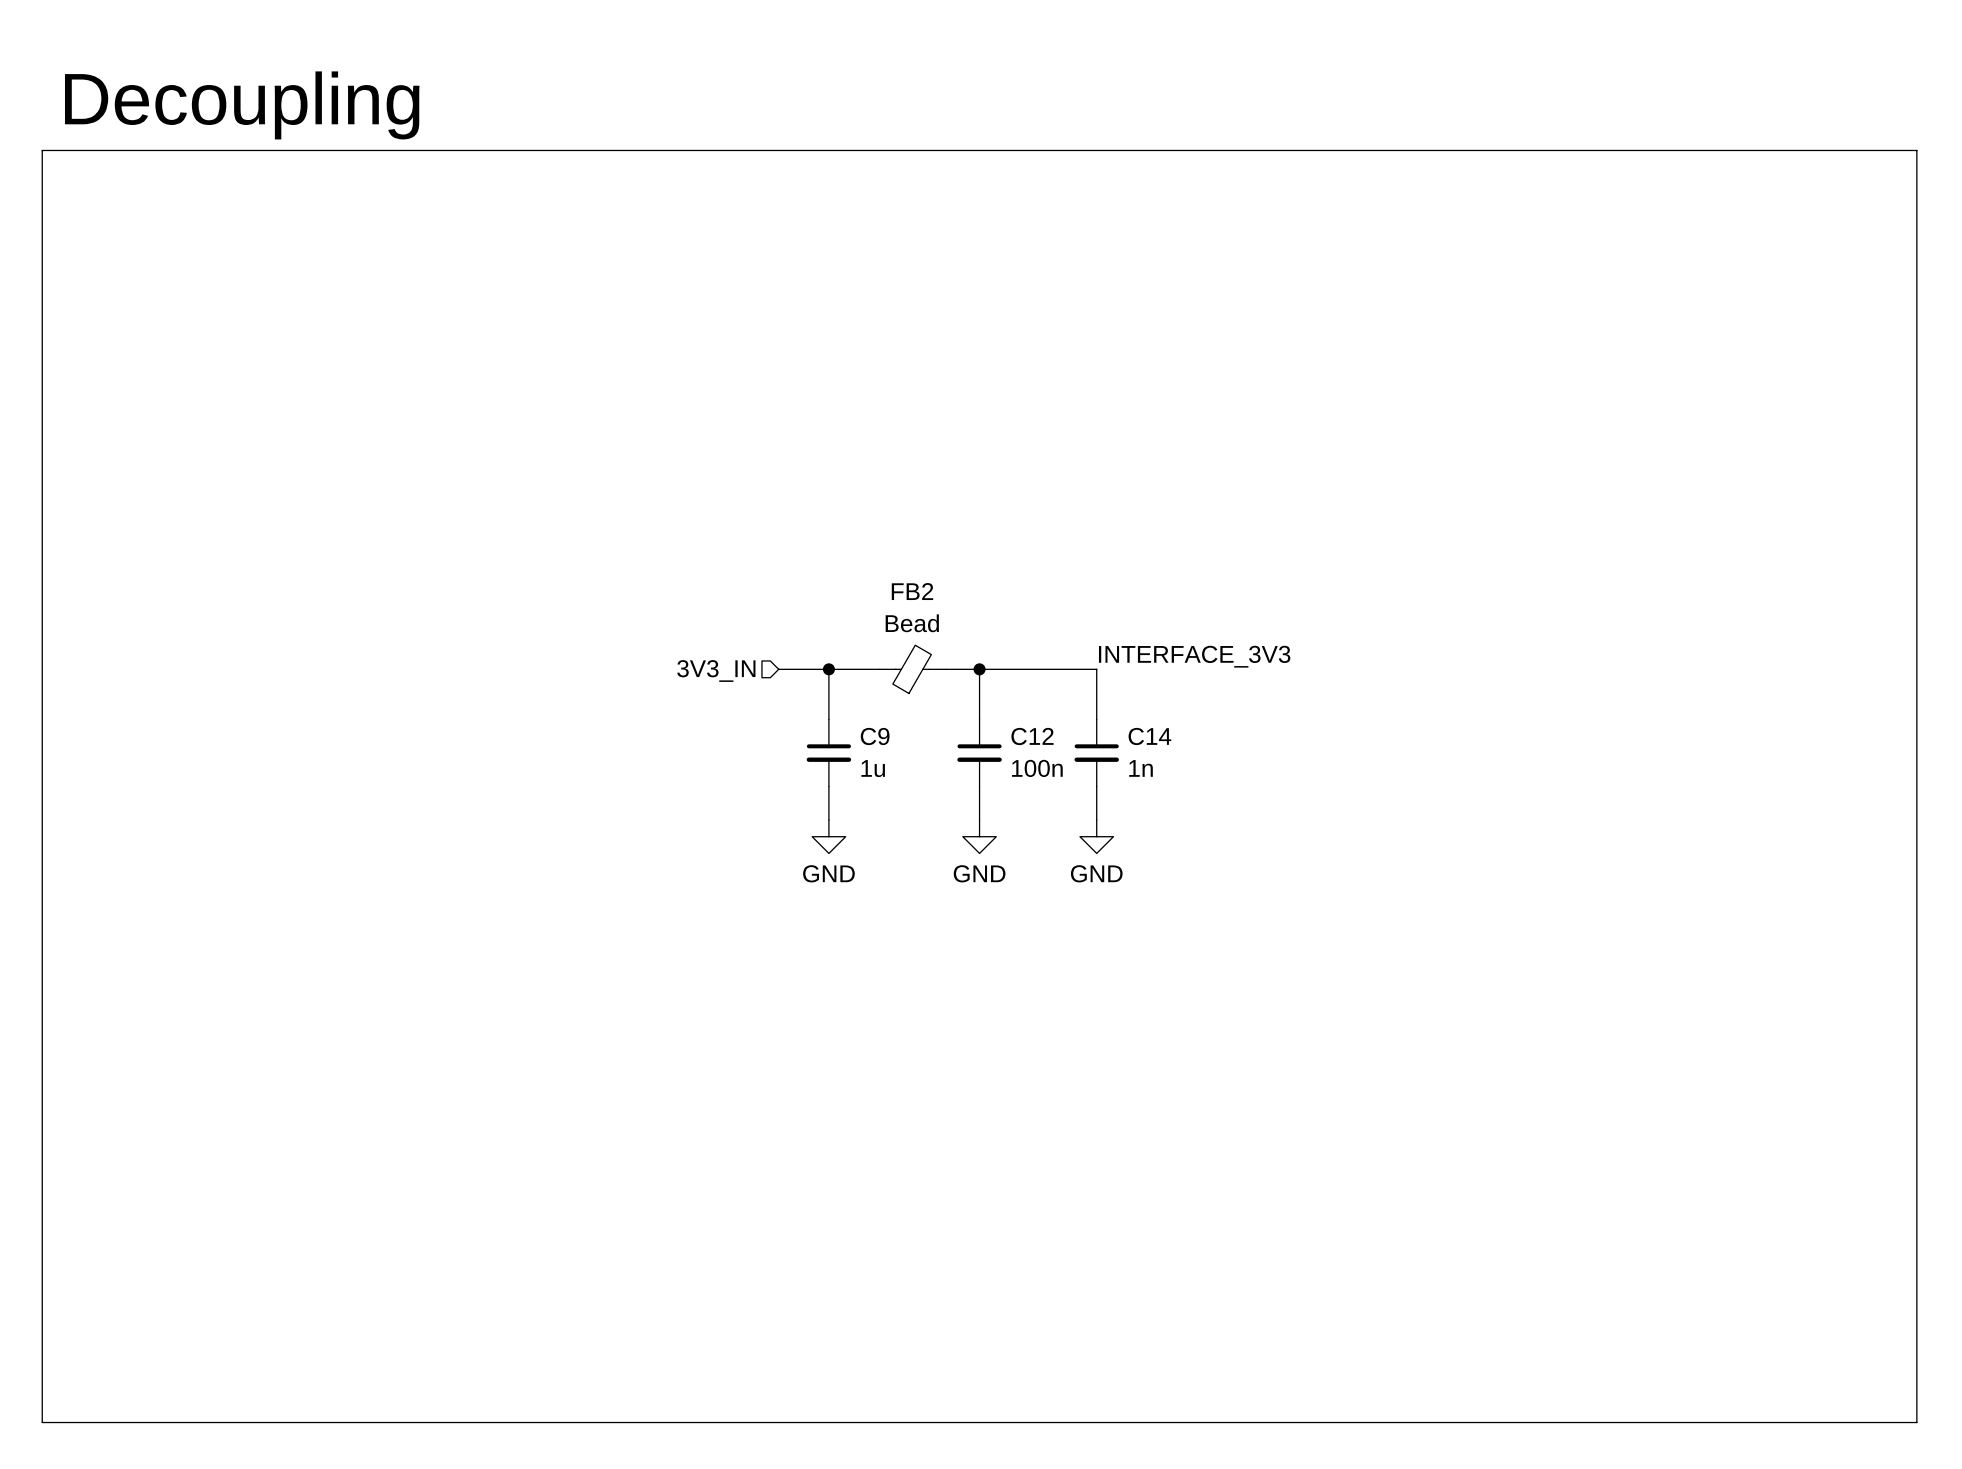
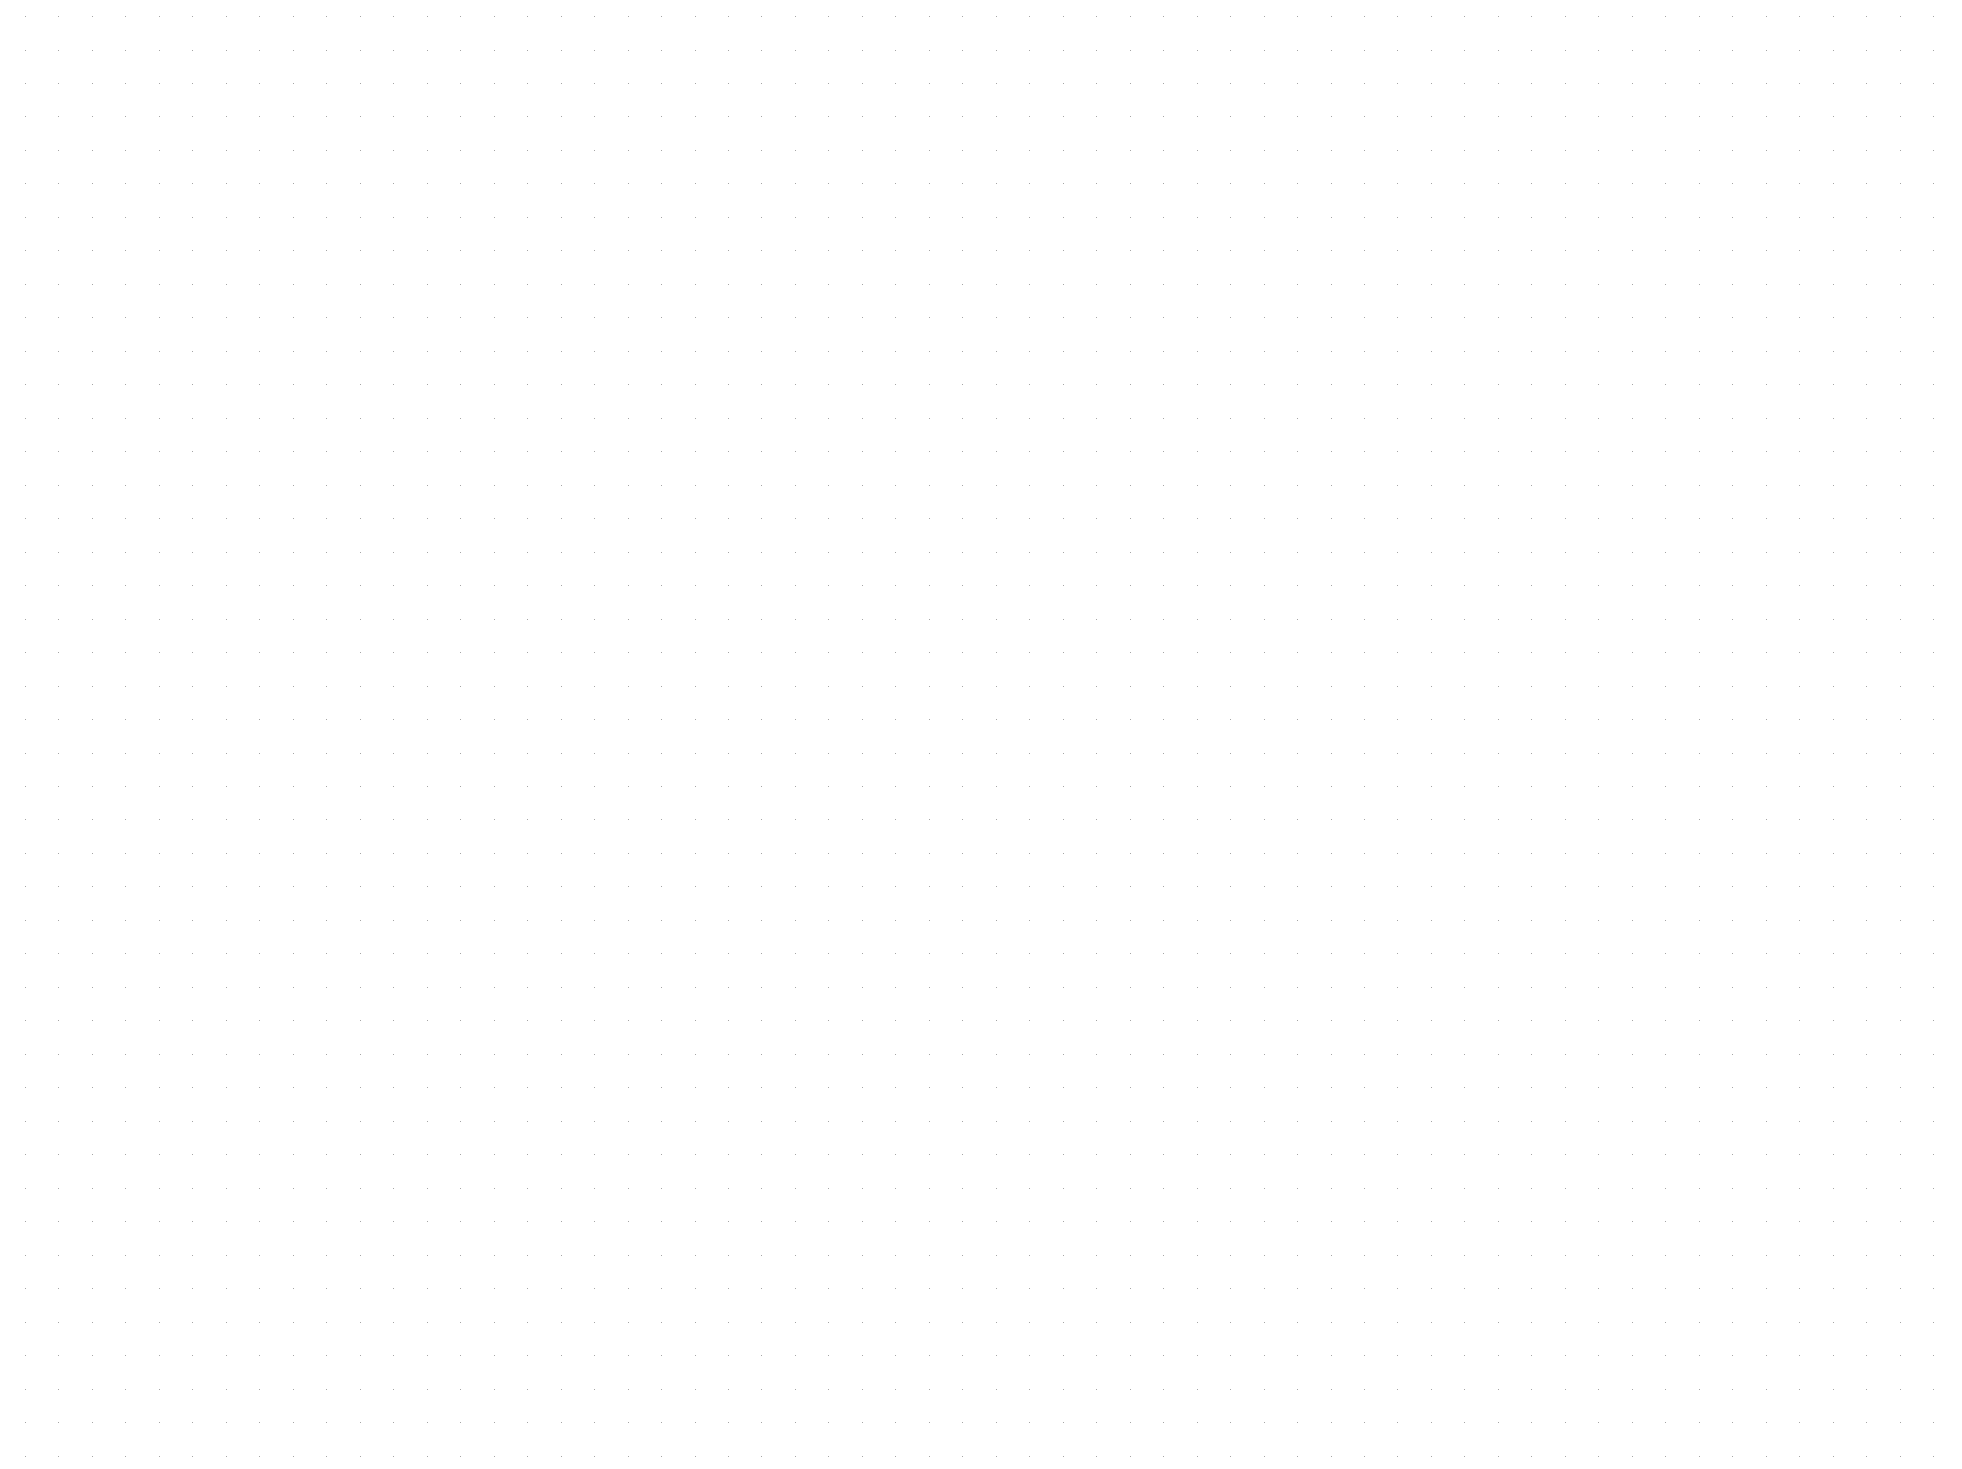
text: Decoupling (242, 105) -> none
line: (42, 150) (1916, 150) (1916, 1422) (42, 1422) (42, 150) -> none
label: INTERFACE_3V3 (1194, 656) -> none
wire: (778, 669) (879, 669) -> none
wire: (828, 669) (828, 719) -> none
junction: (828, 669) -> none
FB2: Bead (912, 669) -> none
wire: (946, 669) (1096, 669) (1096, 719) -> none
wire: (979, 669) (979, 719) -> none
junction: (979, 669) -> none
hierarchical label: 3V3_IN (716, 671) -> none
C9: 1u (828, 753) -> none
C12: 100n (979, 753) -> none
C14: 1n (1096, 753) -> none
wire: (828, 786) (828, 819) -> none
wire: (979, 786) (979, 819) -> none
wire: (1096, 786) (1096, 819) -> none
power symbol: GND (828, 836) -> none
power symbol: GND (979, 836) -> none
power symbol: GND (1096, 836) -> none

